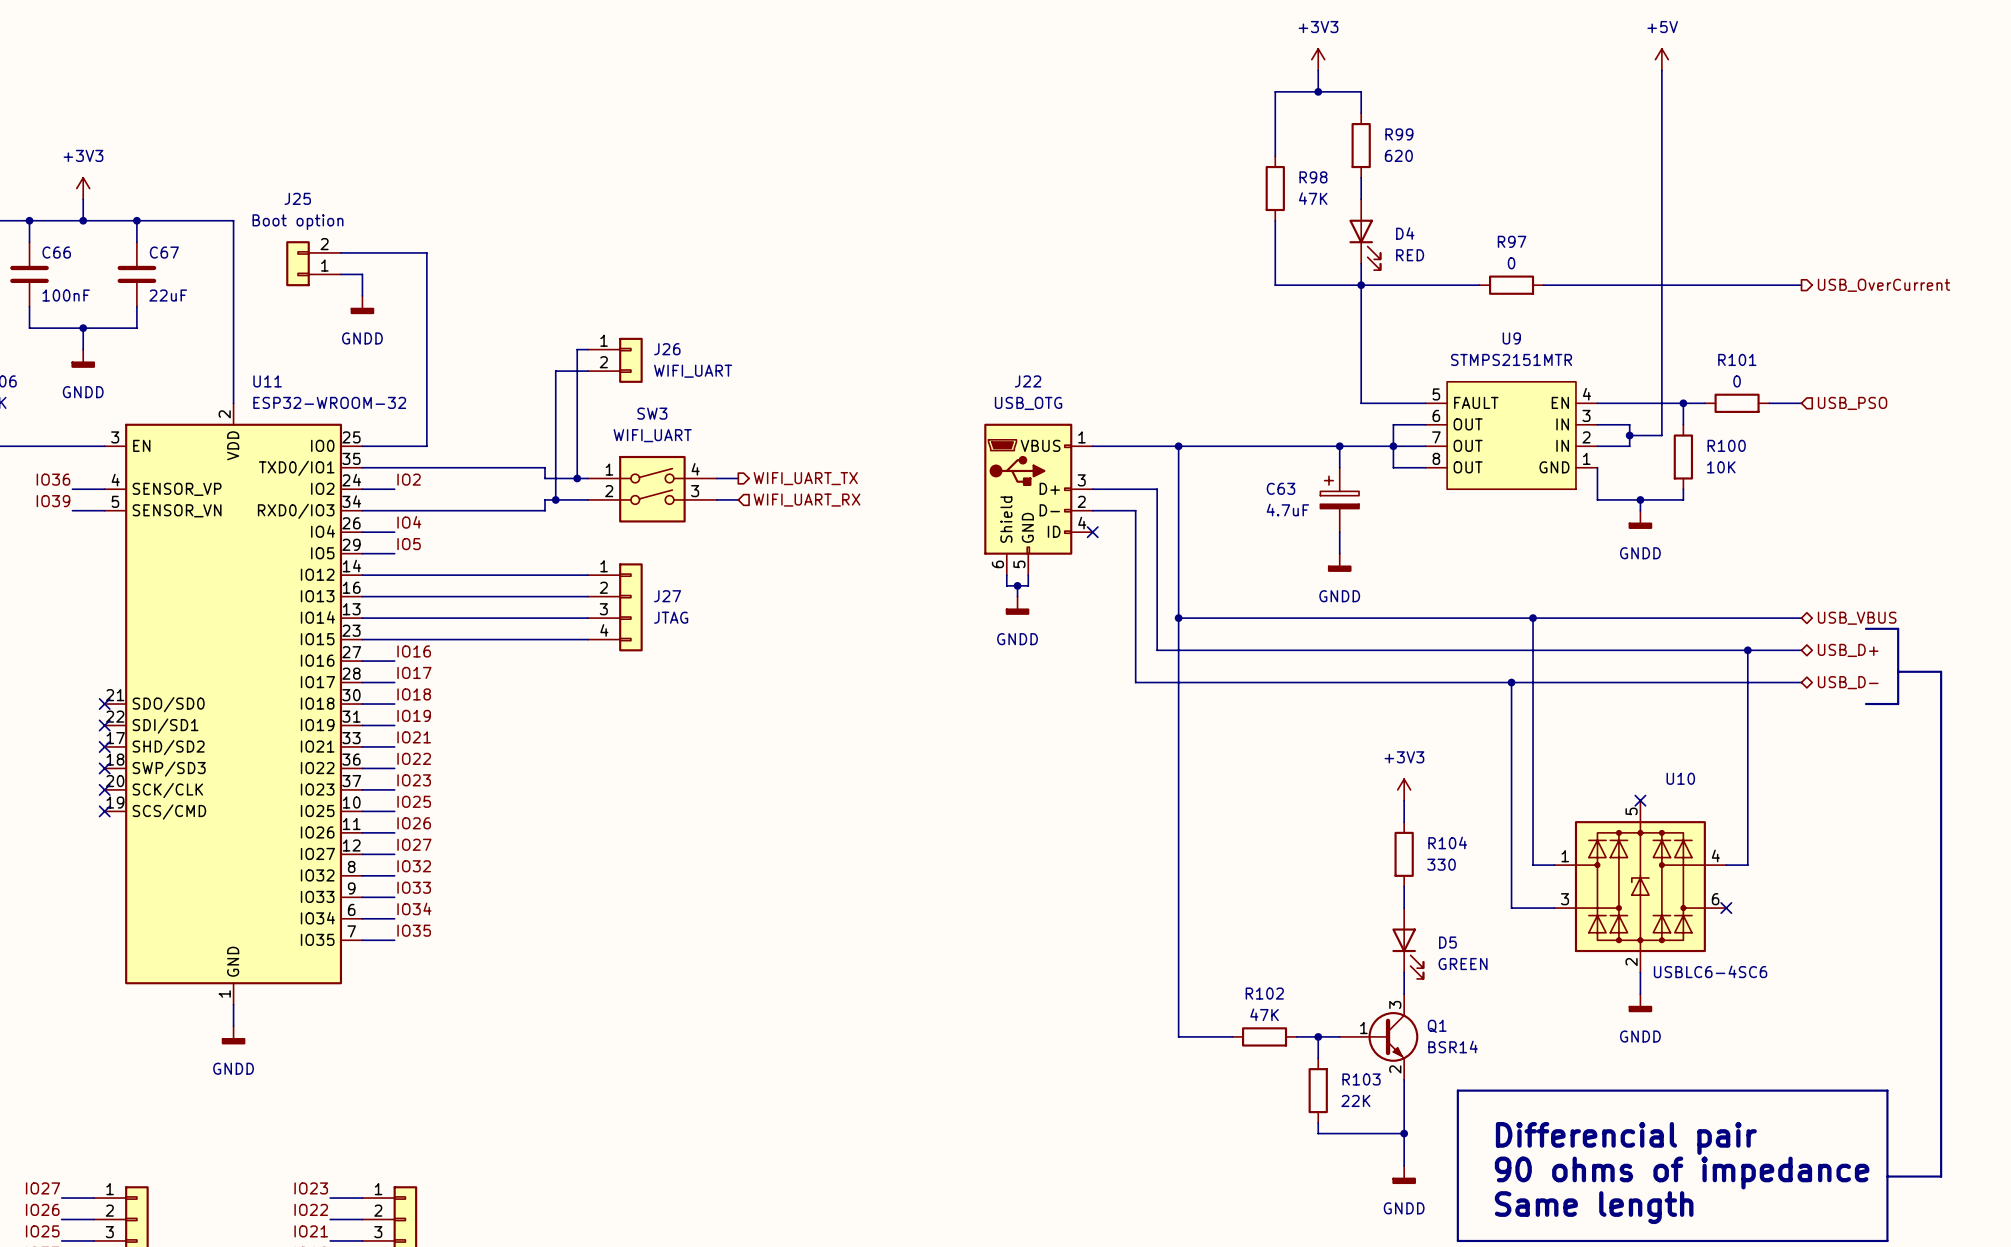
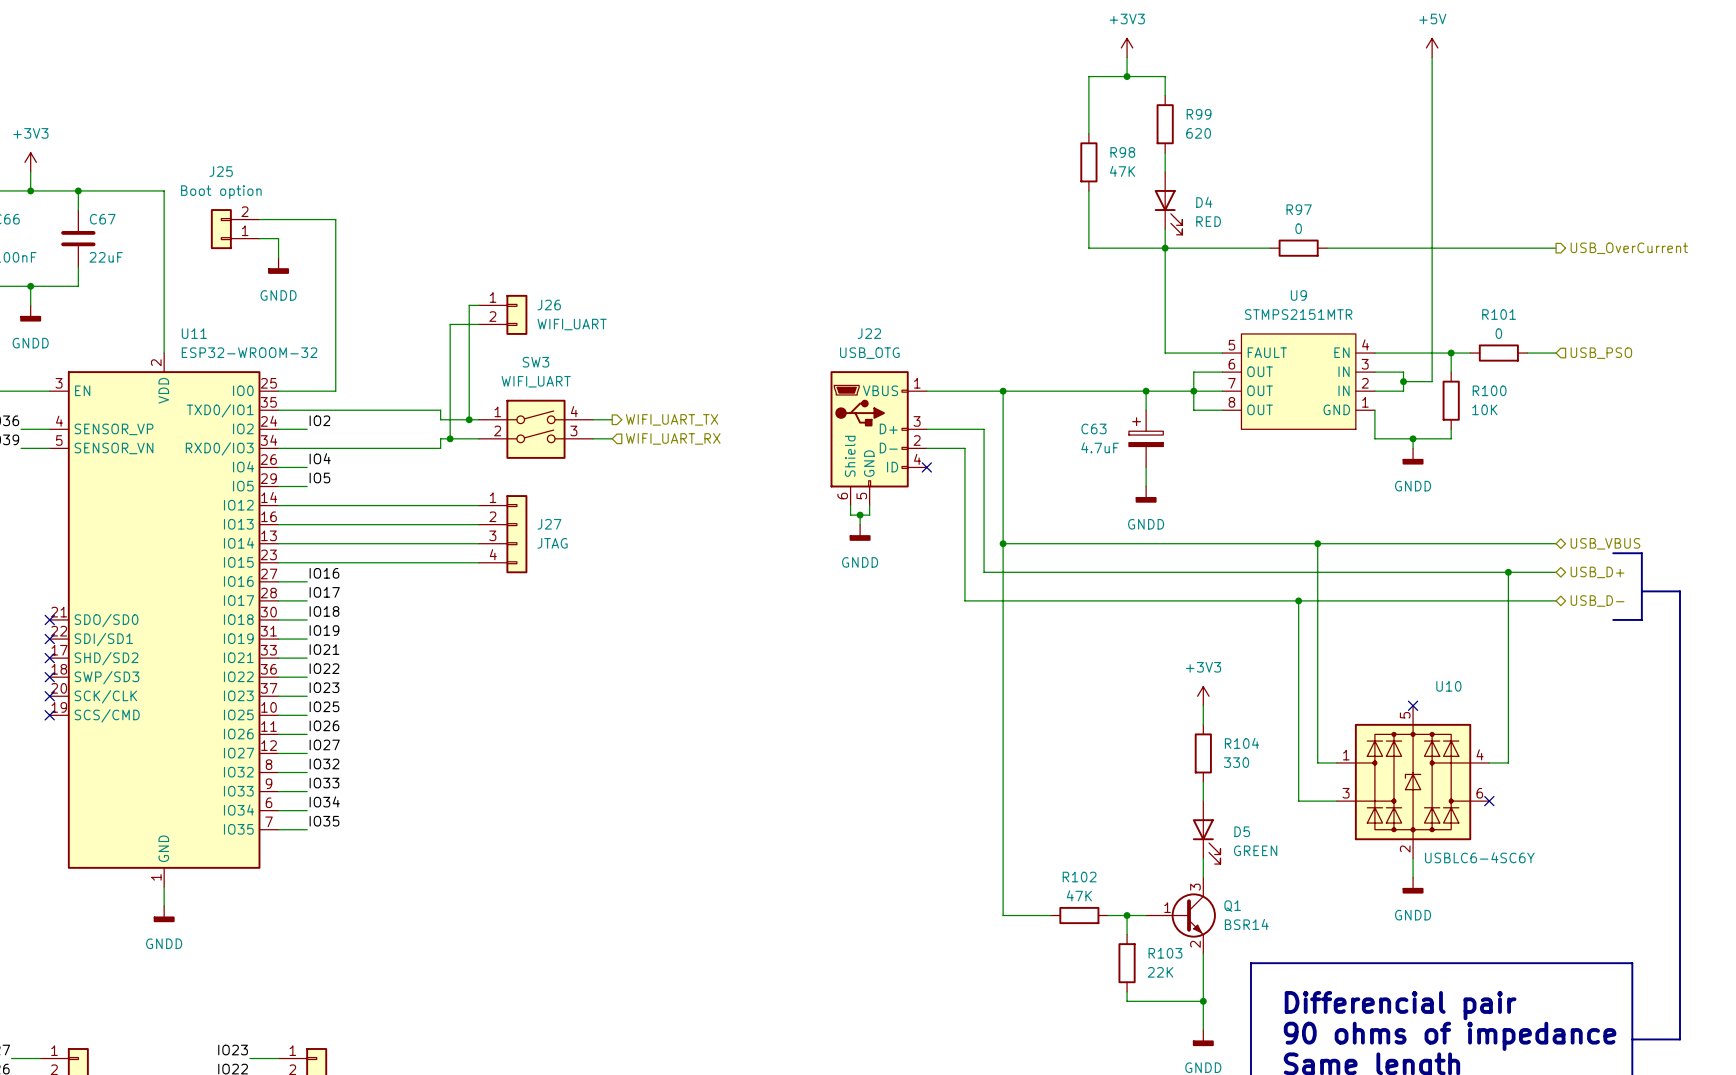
U10 value: USBLC6-4SC6 (1710, 971) -> USBLC6-4SC6Y (1479, 857)

